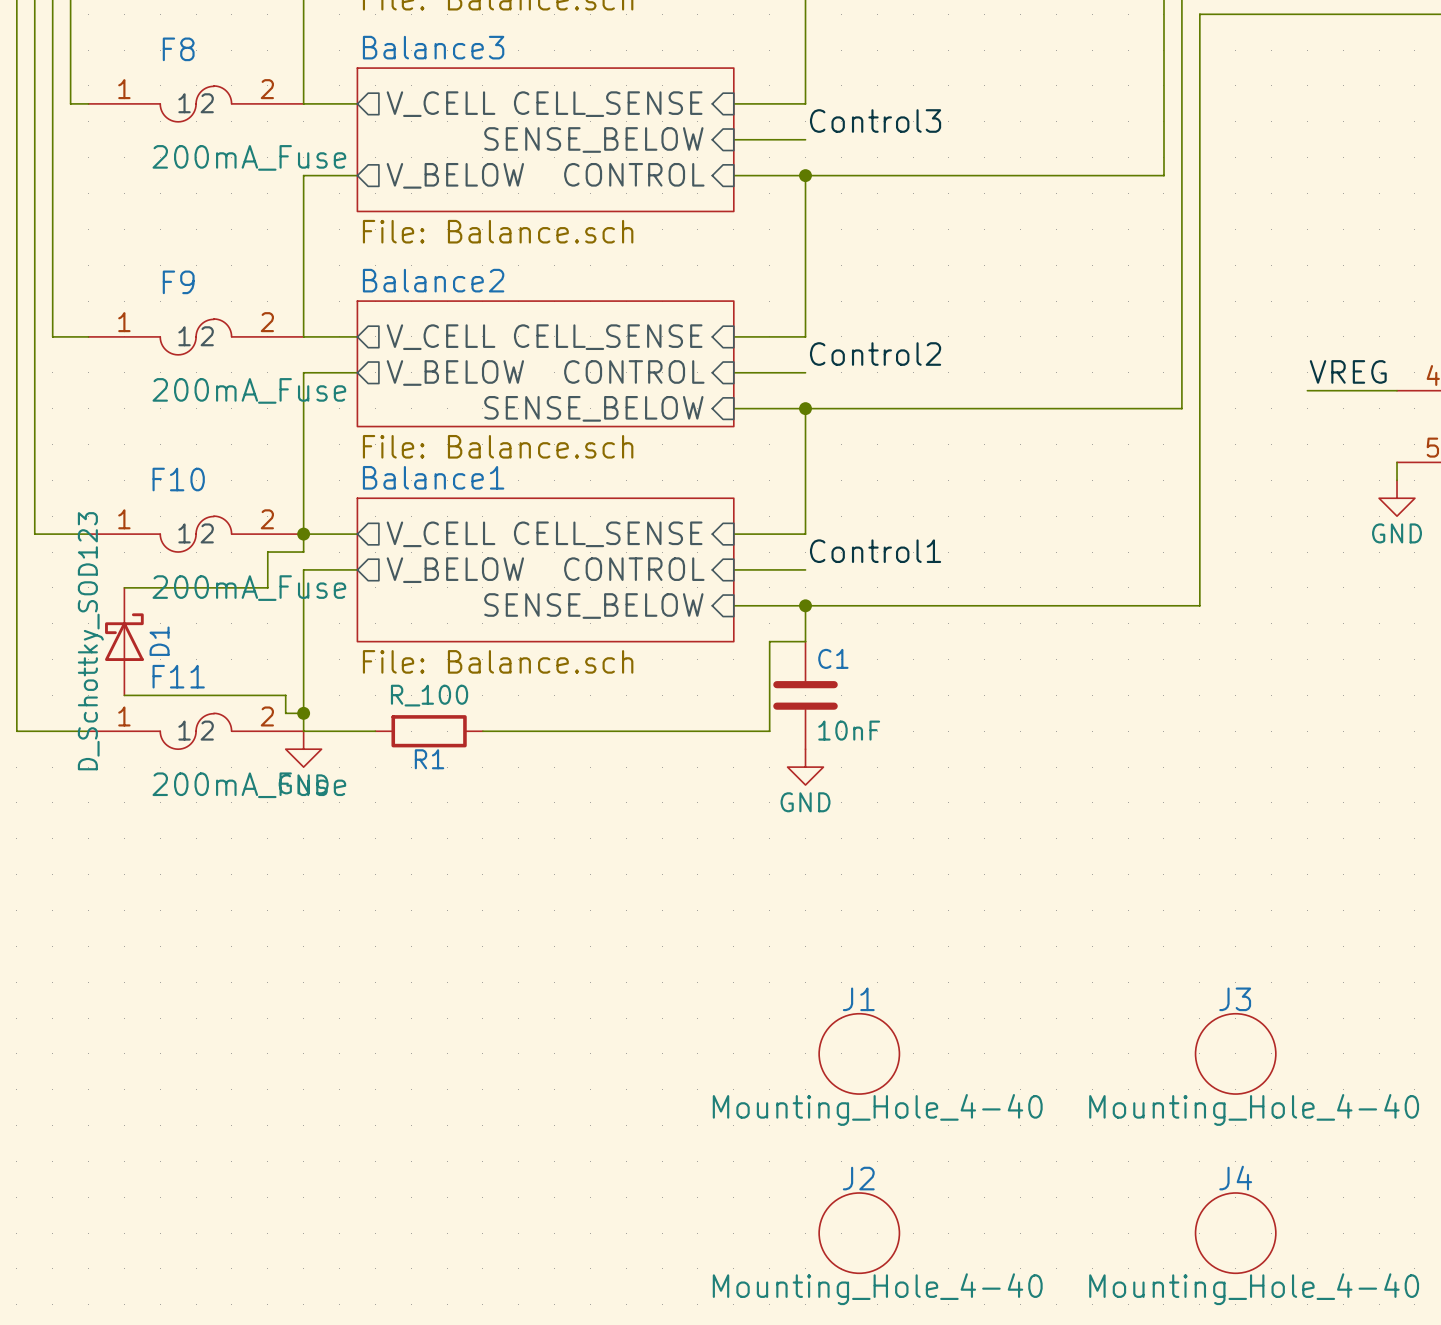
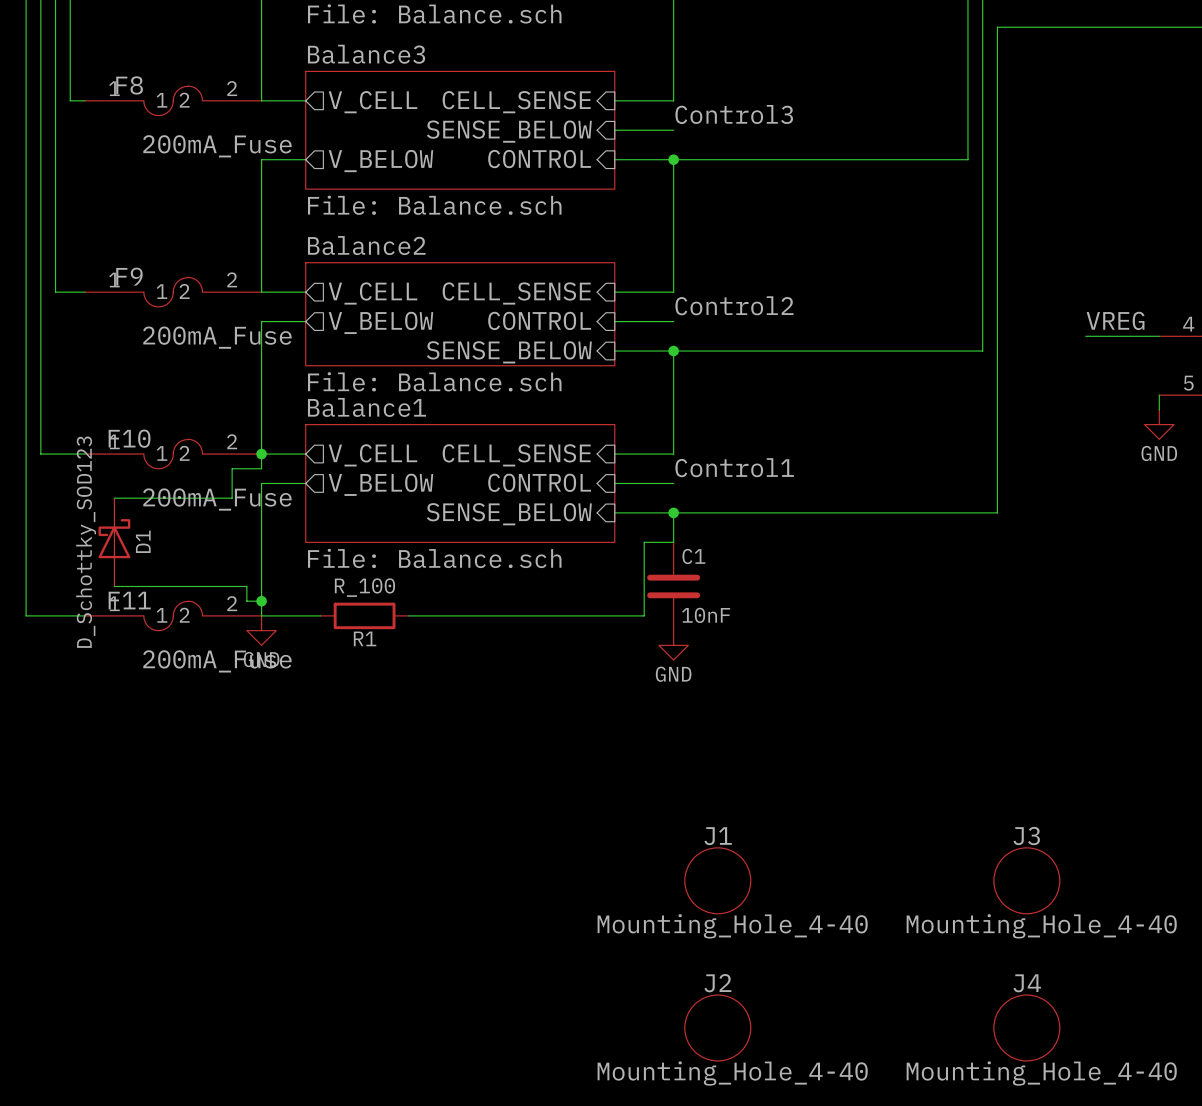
F8 name position: F8 (178, 49) -> F8 (129, 85)
F9 name position: F9 (178, 282) -> F9 (129, 276)
F10 name position: F10 (178, 479) -> F10 (129, 438)
F11 name position: F11 (178, 676) -> F11 (129, 600)

